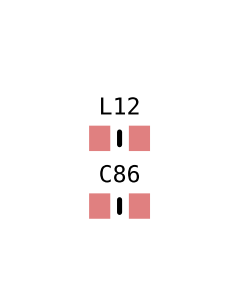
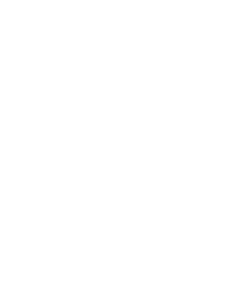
L12: (119, 138) -> none
C86: (119, 206) -> none

